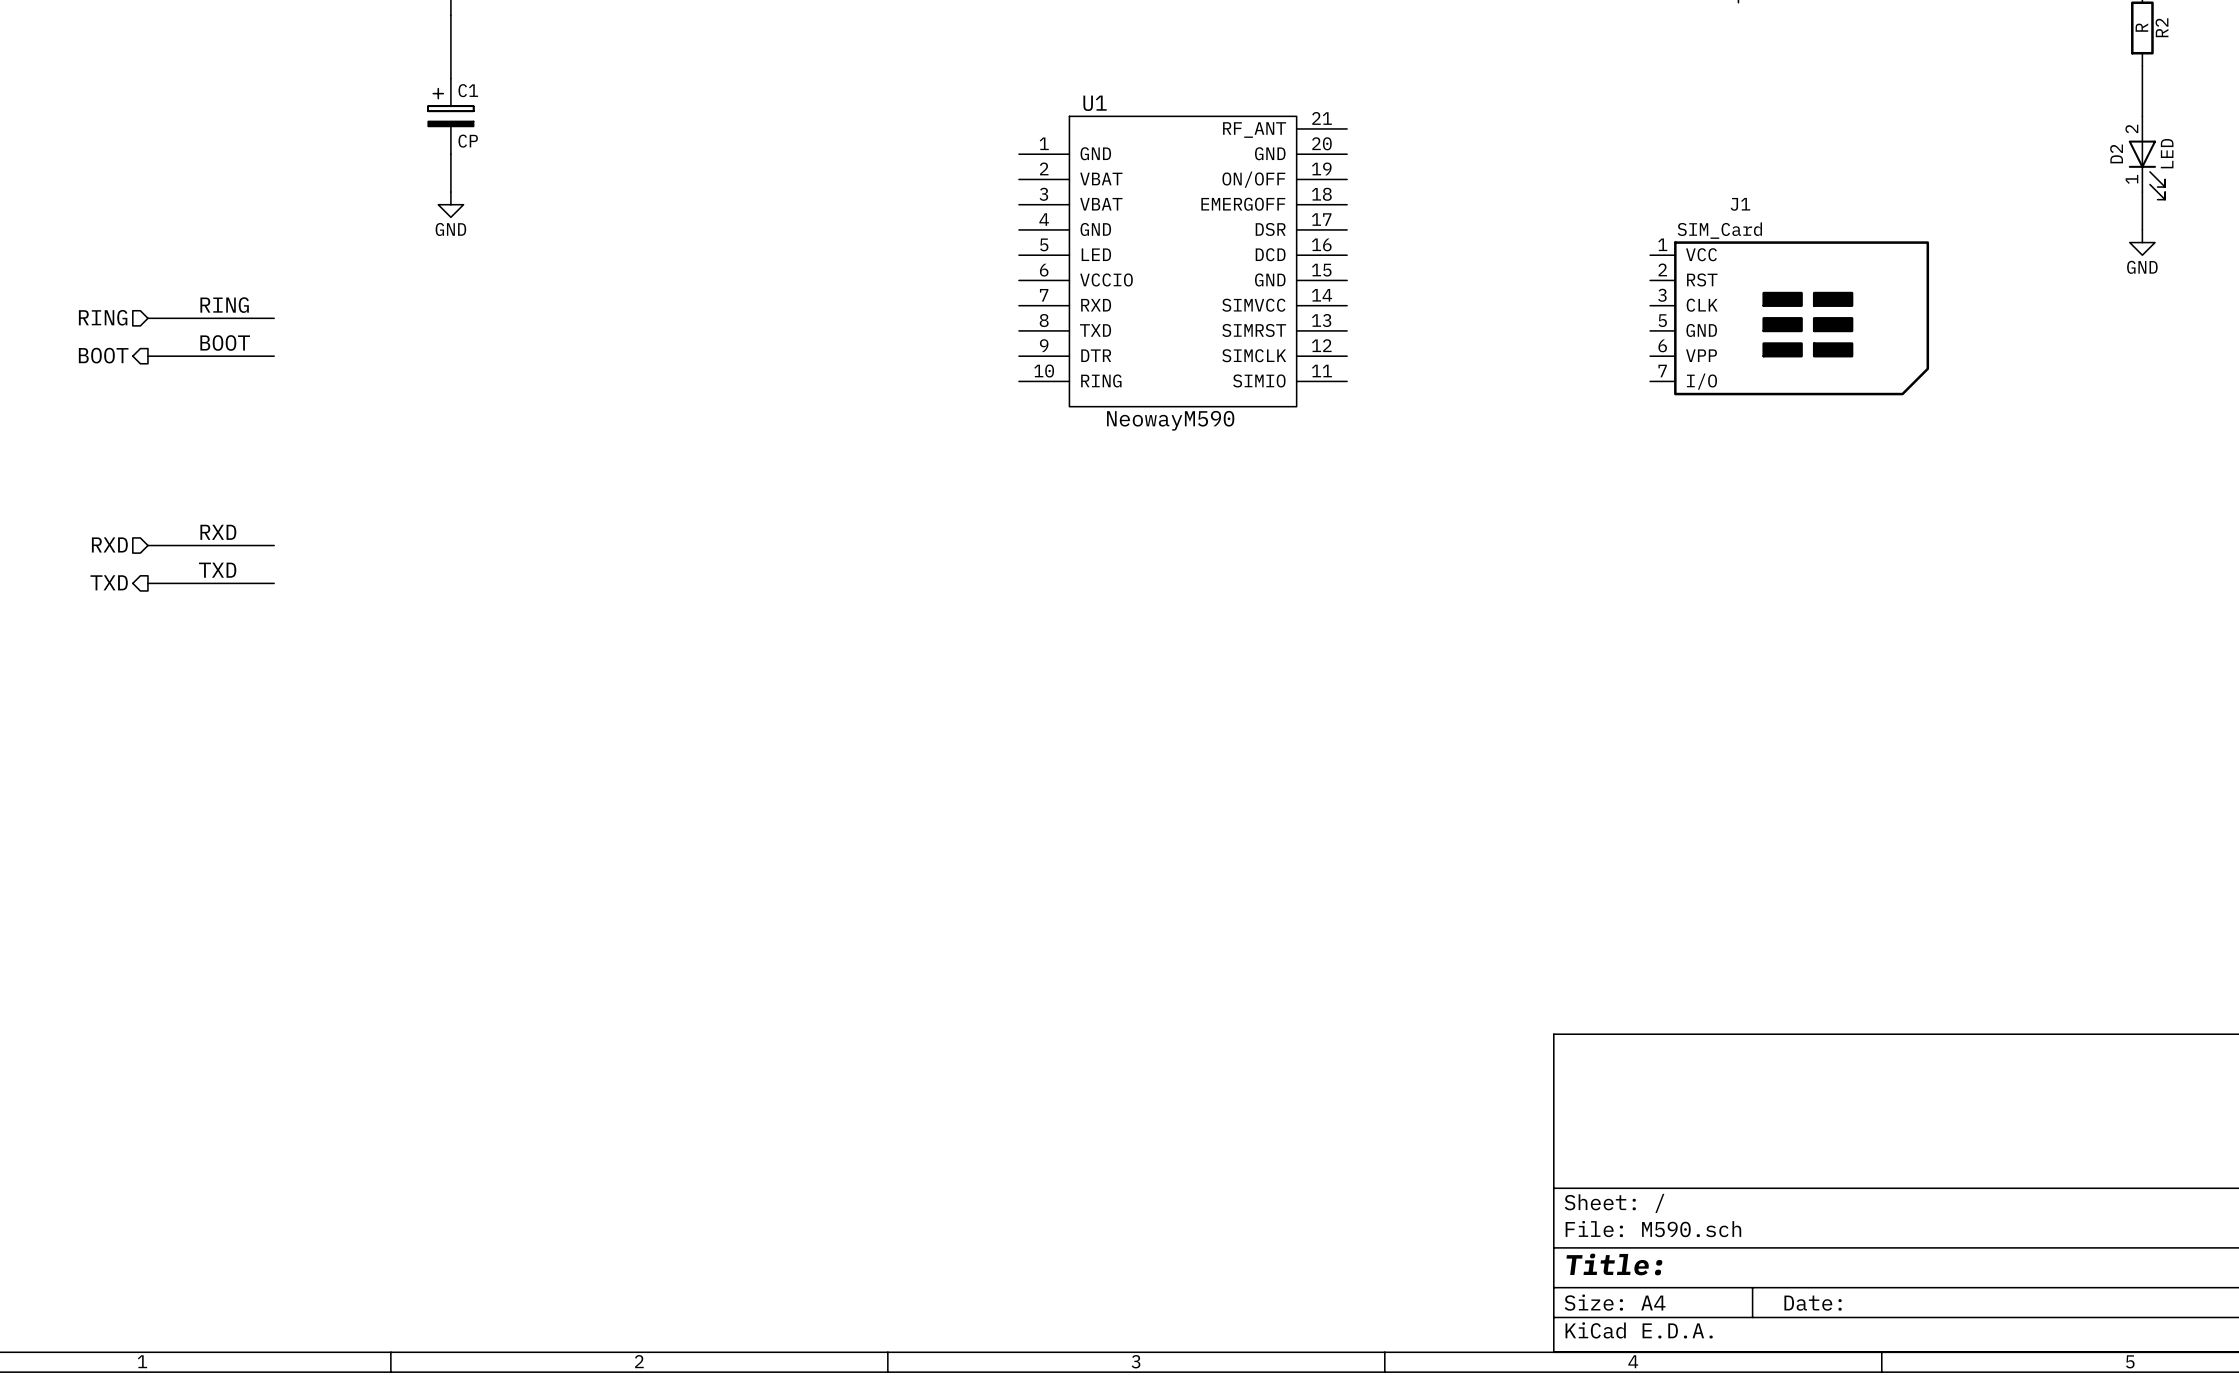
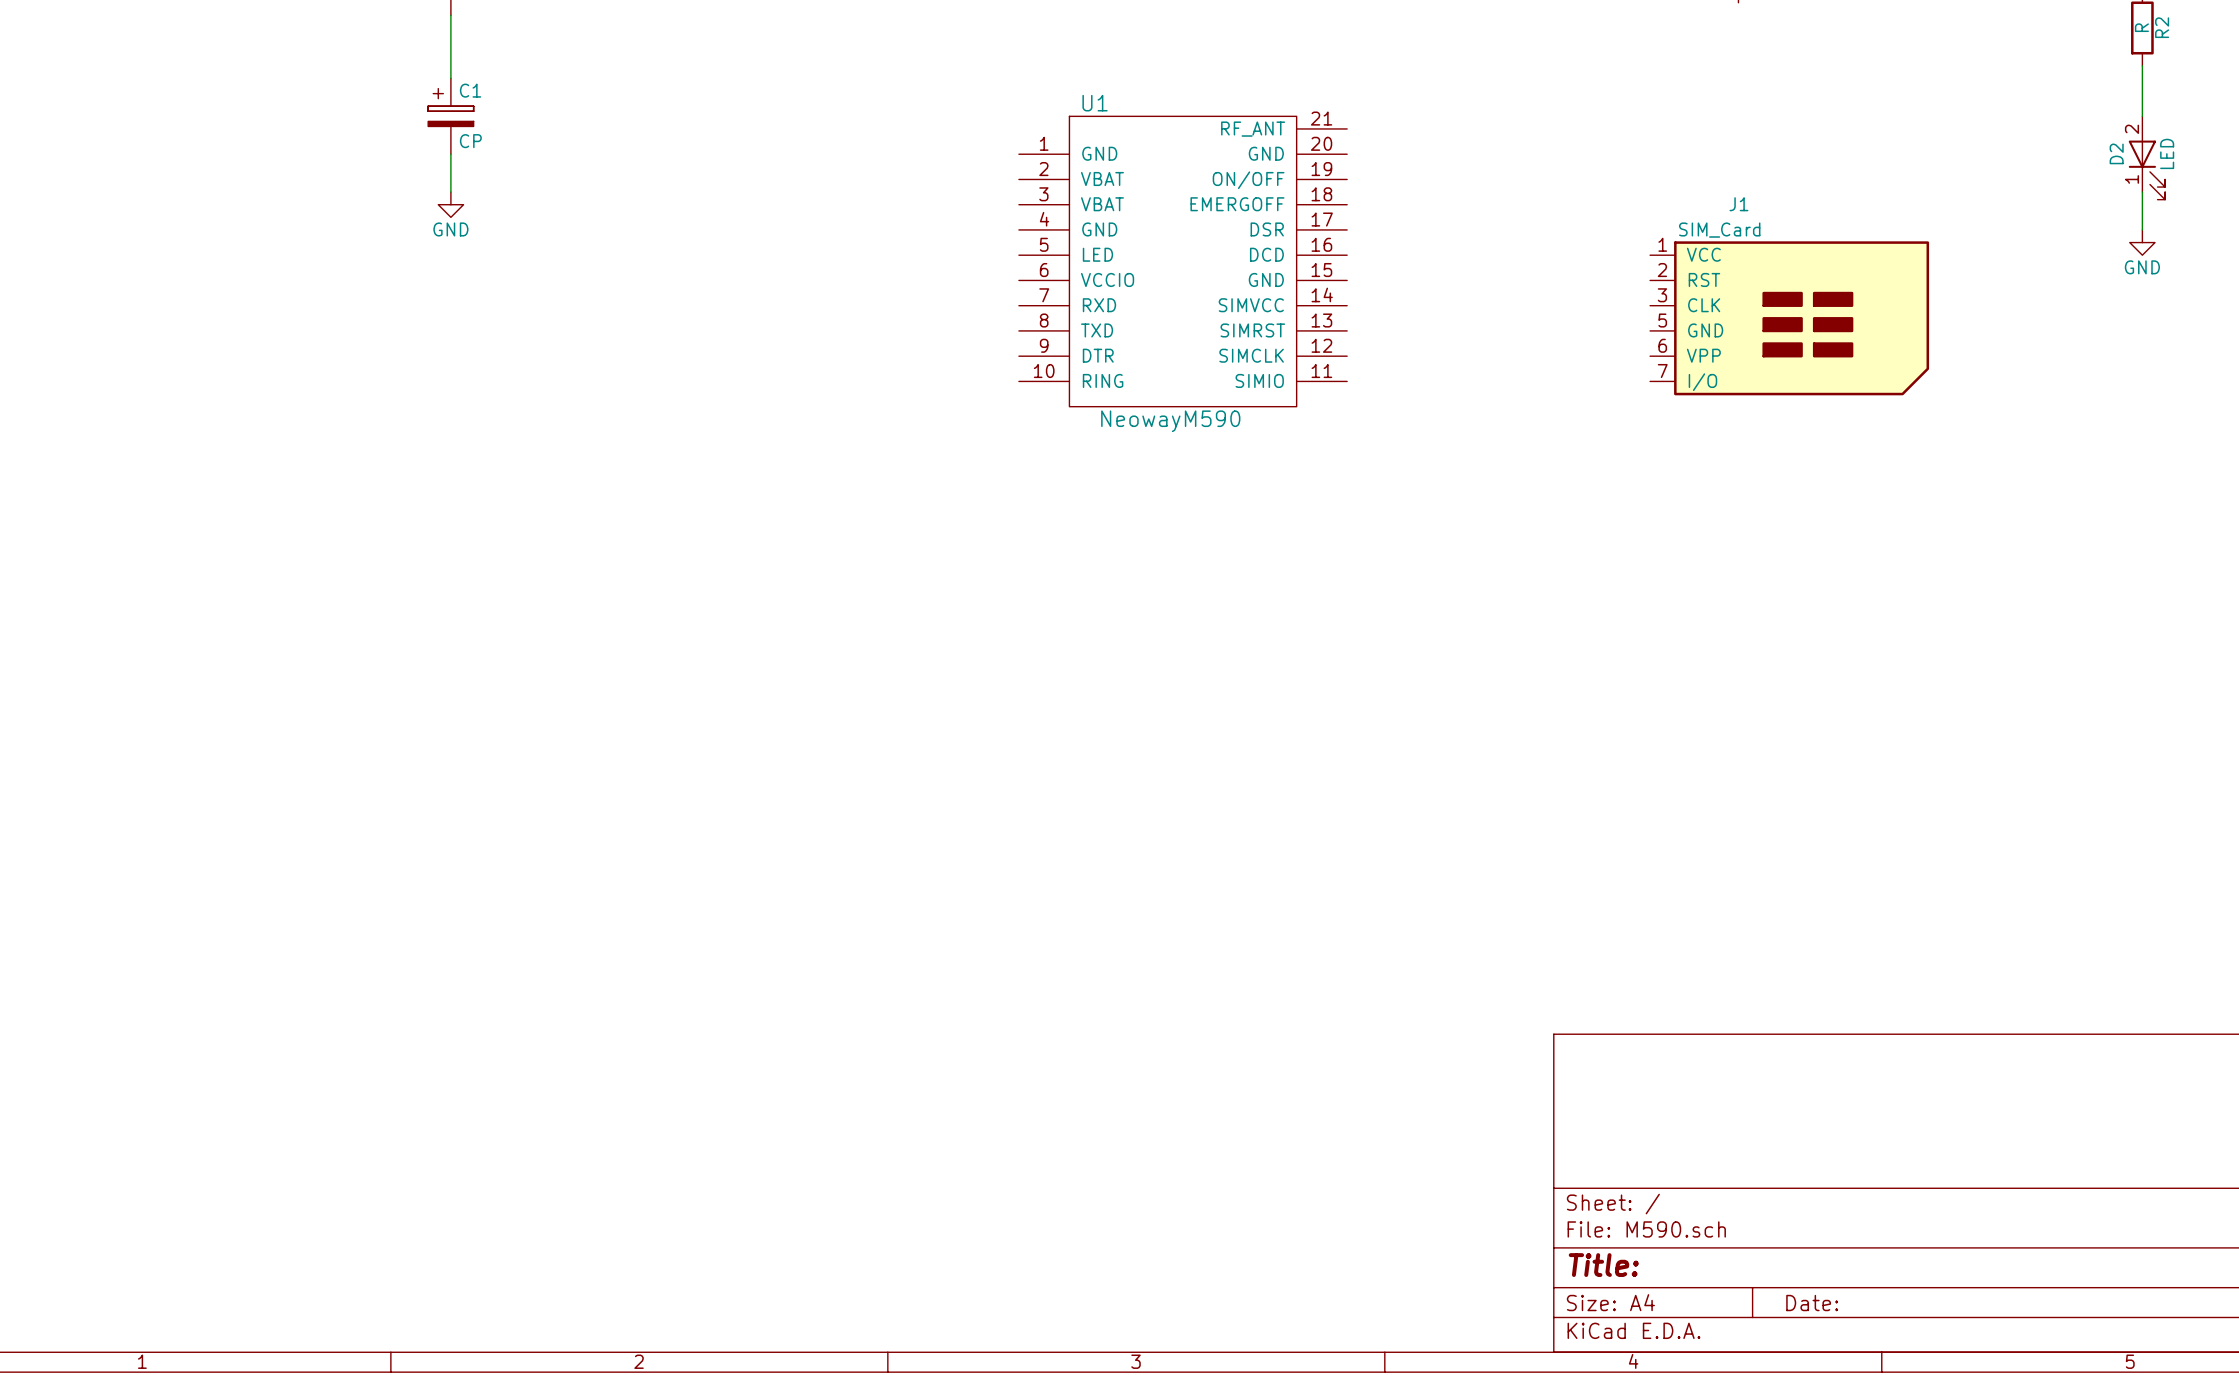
label: RING (224, 305) -> none
hierarchical label: RING (103, 317) -> none
wire: (147, 318) (274, 318) -> none
label: BOOT (225, 342) -> none
hierarchical label: BOOT (103, 355) -> none
wire: (147, 356) (274, 356) -> none
label: RXD (218, 532) -> none
hierarchical label: RXD (109, 544) -> none
wire: (147, 545) (274, 545) -> none
label: TXD (217, 570) -> none
hierarchical label: TXD (109, 582) -> none
wire: (147, 583) (274, 583) -> none

